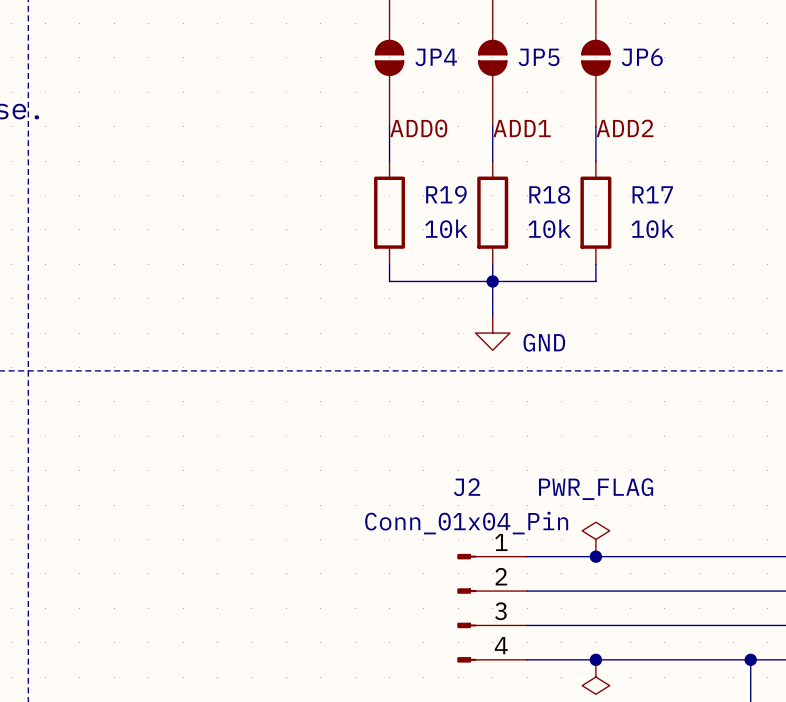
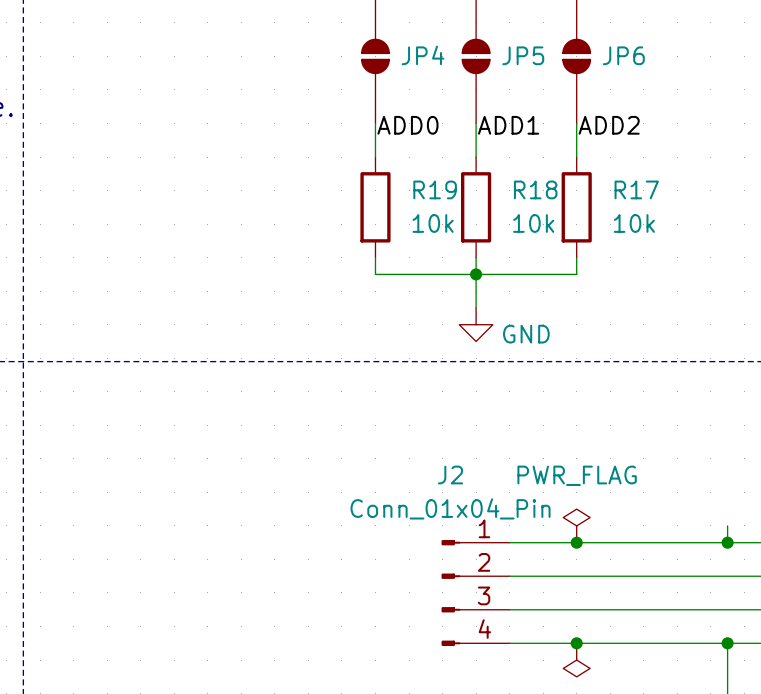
wire: none -> (727, 525) (727, 542)
junction: none -> (727, 542)

